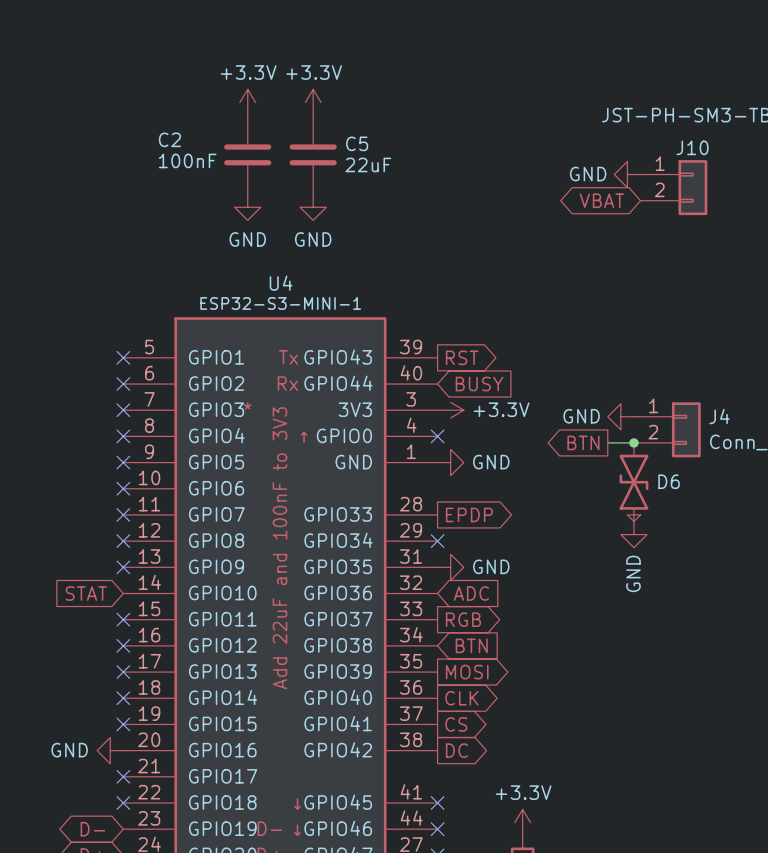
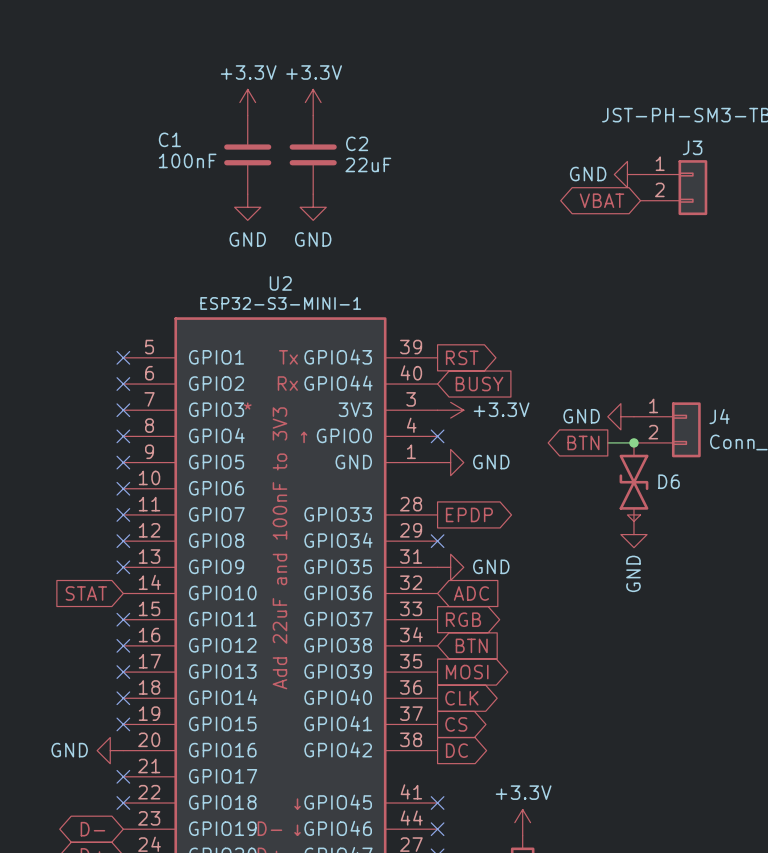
C2 name: C2 (169, 139) -> C1 (169, 139)
C5 name: C5 (357, 143) -> C2 (357, 143)
J10 name: J10 (692, 147) -> J3 (692, 147)
U4 name: U4 (281, 283) -> U2 (280, 283)

